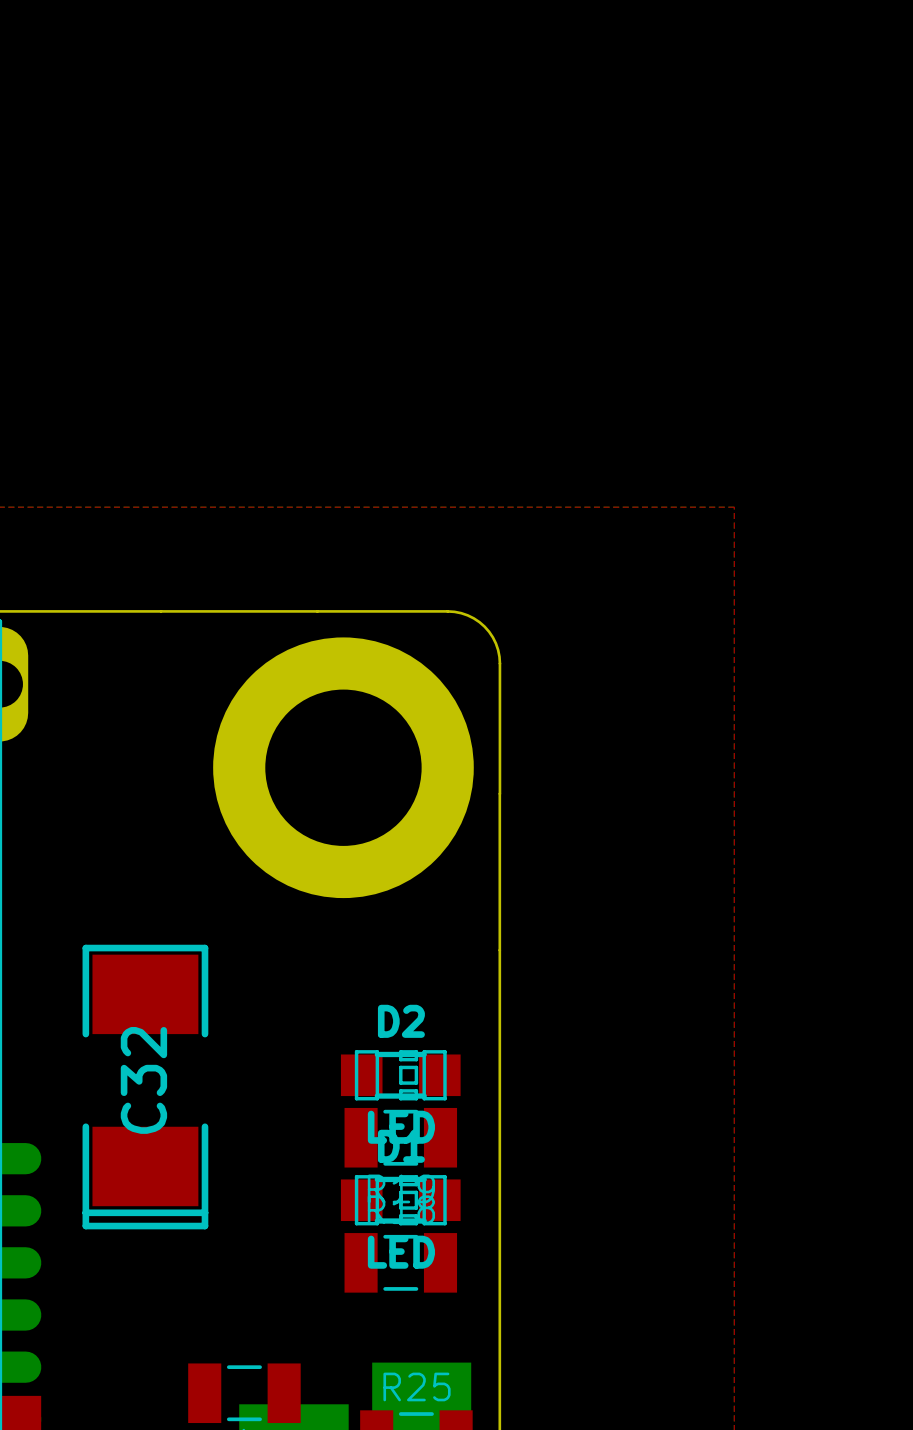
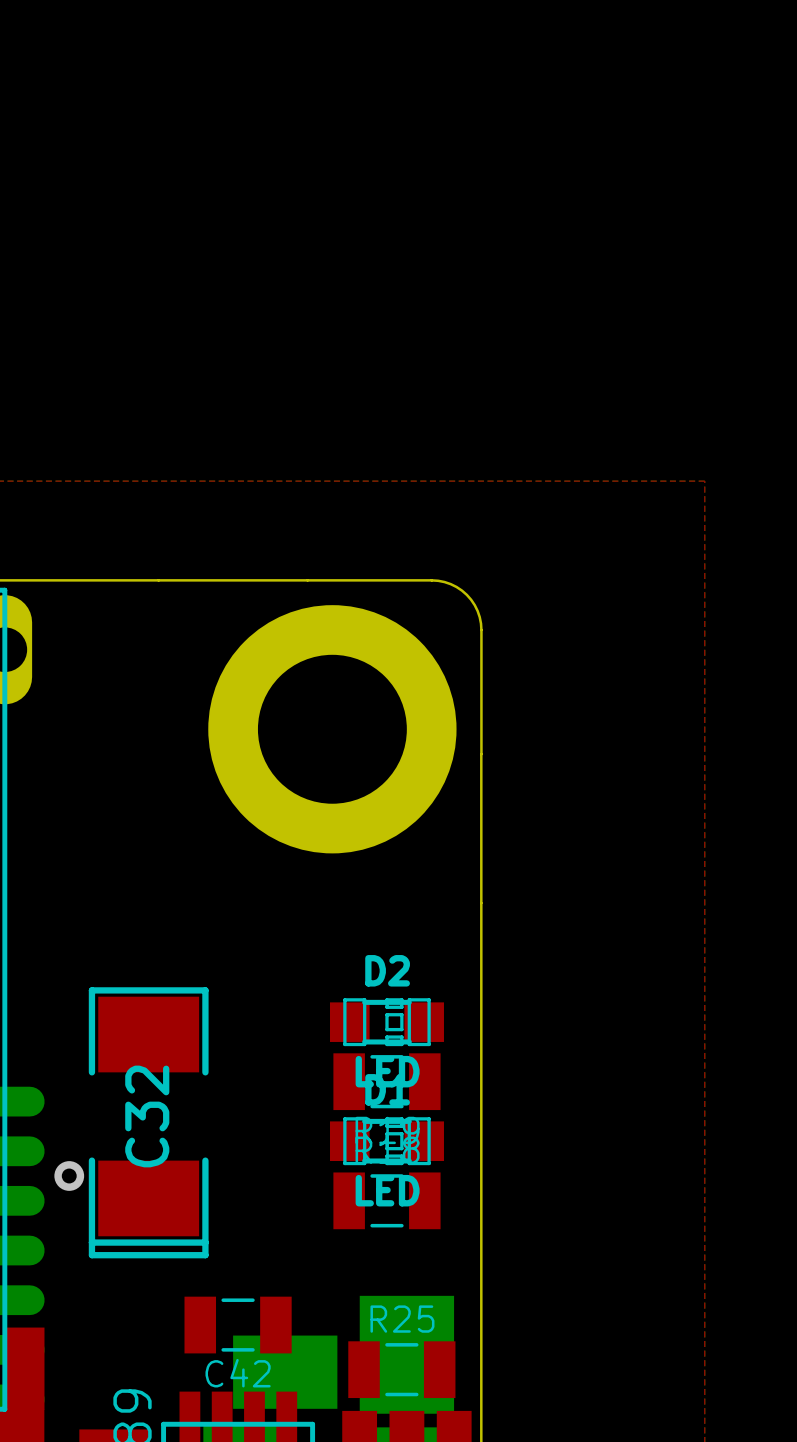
C32 position: (145, 1087) -> (148, 1122)
via: none -> (69, 1176)

